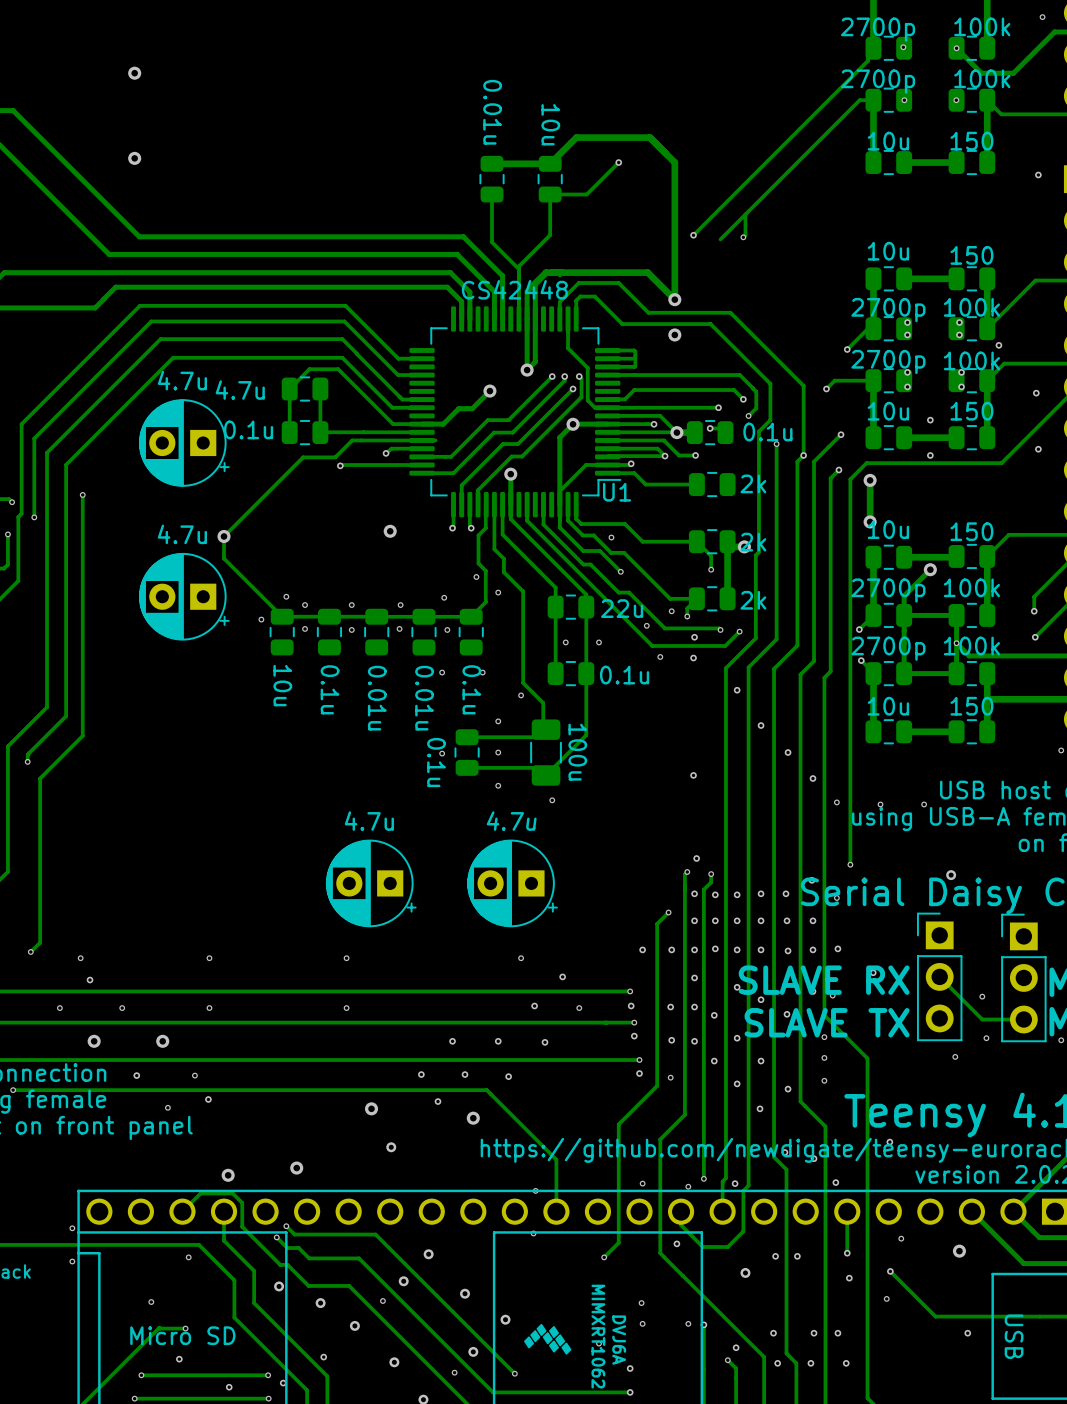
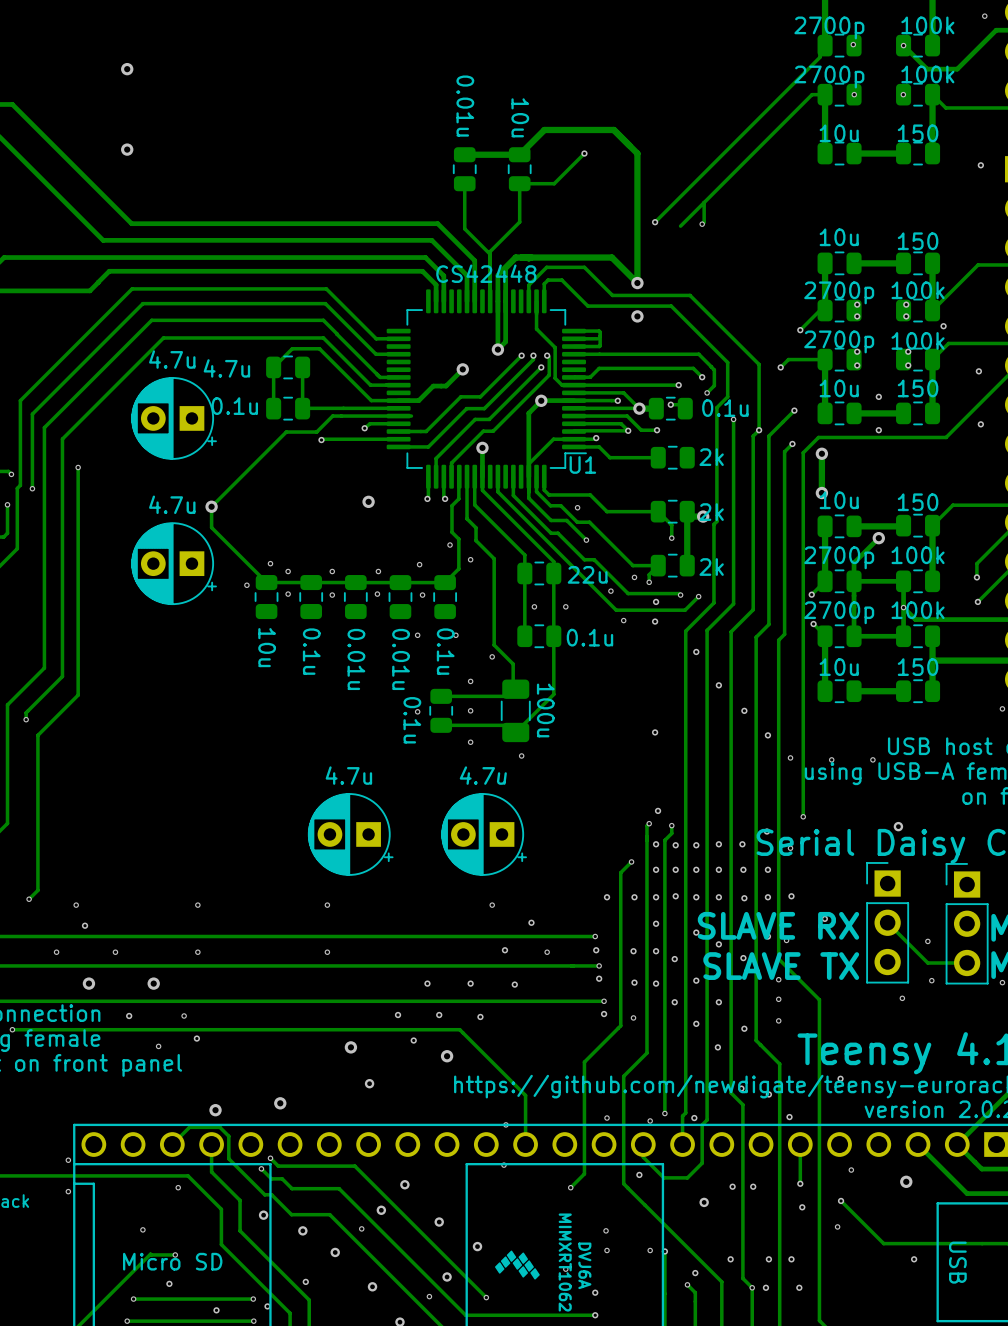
via: (777, 1363) -> none
via: none -> (752, 1287)

